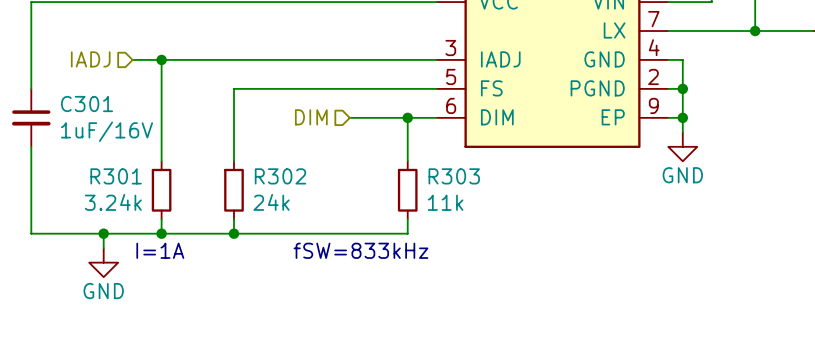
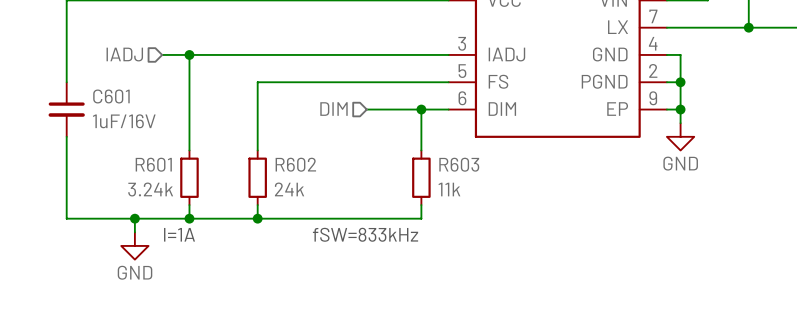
C301 name: C301 (87, 104) -> C601 (111, 96)
R301 name: R301 (116, 176) -> R601 (153, 164)
R302 name: R302 (280, 176) -> R602 (295, 164)
R303 name: R303 (454, 176) -> R603 (459, 164)

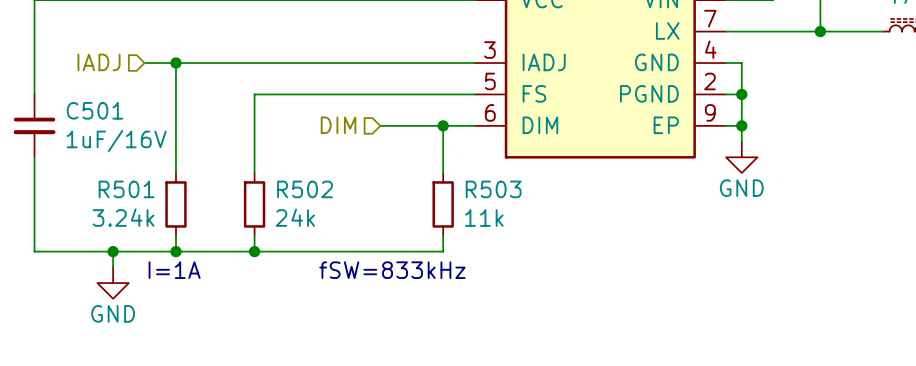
C601 name: C601 (111, 96) -> C501 (95, 110)
R601 name: R601 (153, 164) -> R501 (126, 189)
R602 name: R602 (295, 164) -> R502 (305, 189)
R603 name: R603 (459, 164) -> R503 (493, 189)

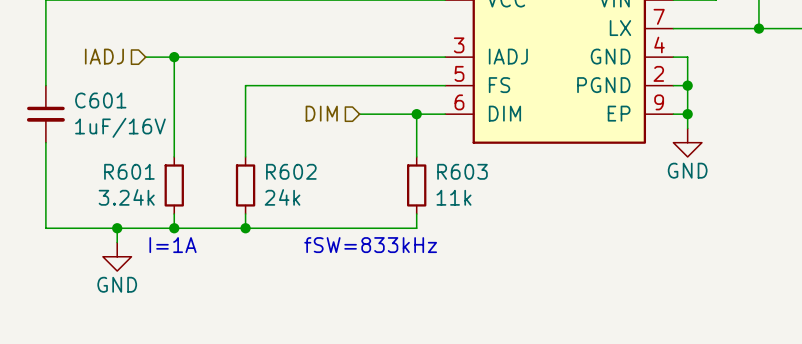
C501 name: C501 (95, 110) -> C601 (100, 100)
R501 name: R501 (126, 189) -> R601 (129, 171)
R502 name: R502 (305, 189) -> R602 (291, 171)
R503 name: R503 (493, 189) -> R603 (462, 171)

